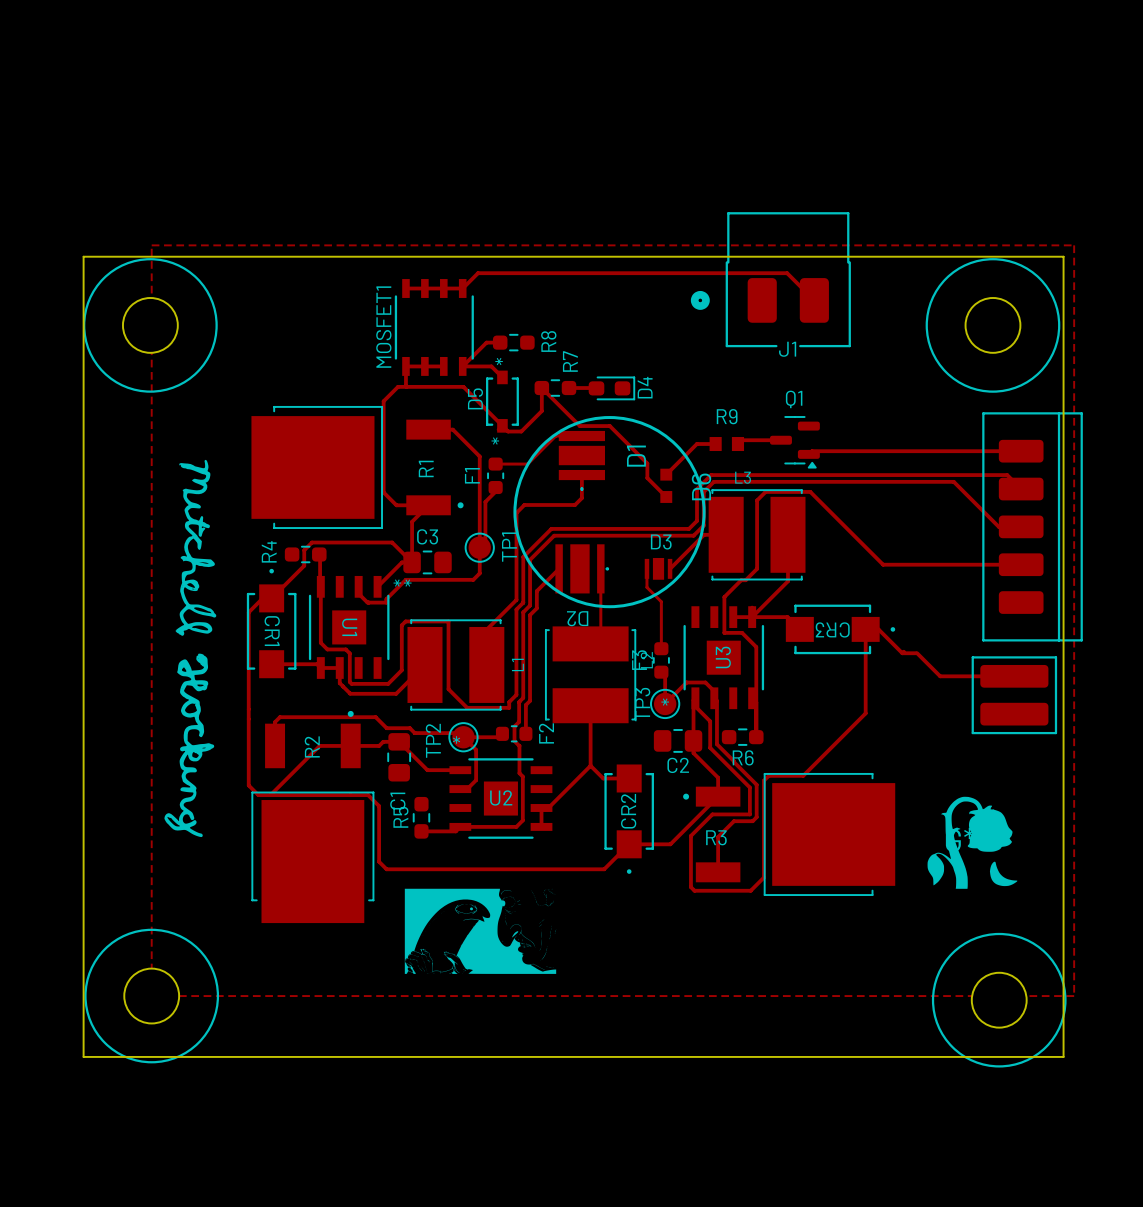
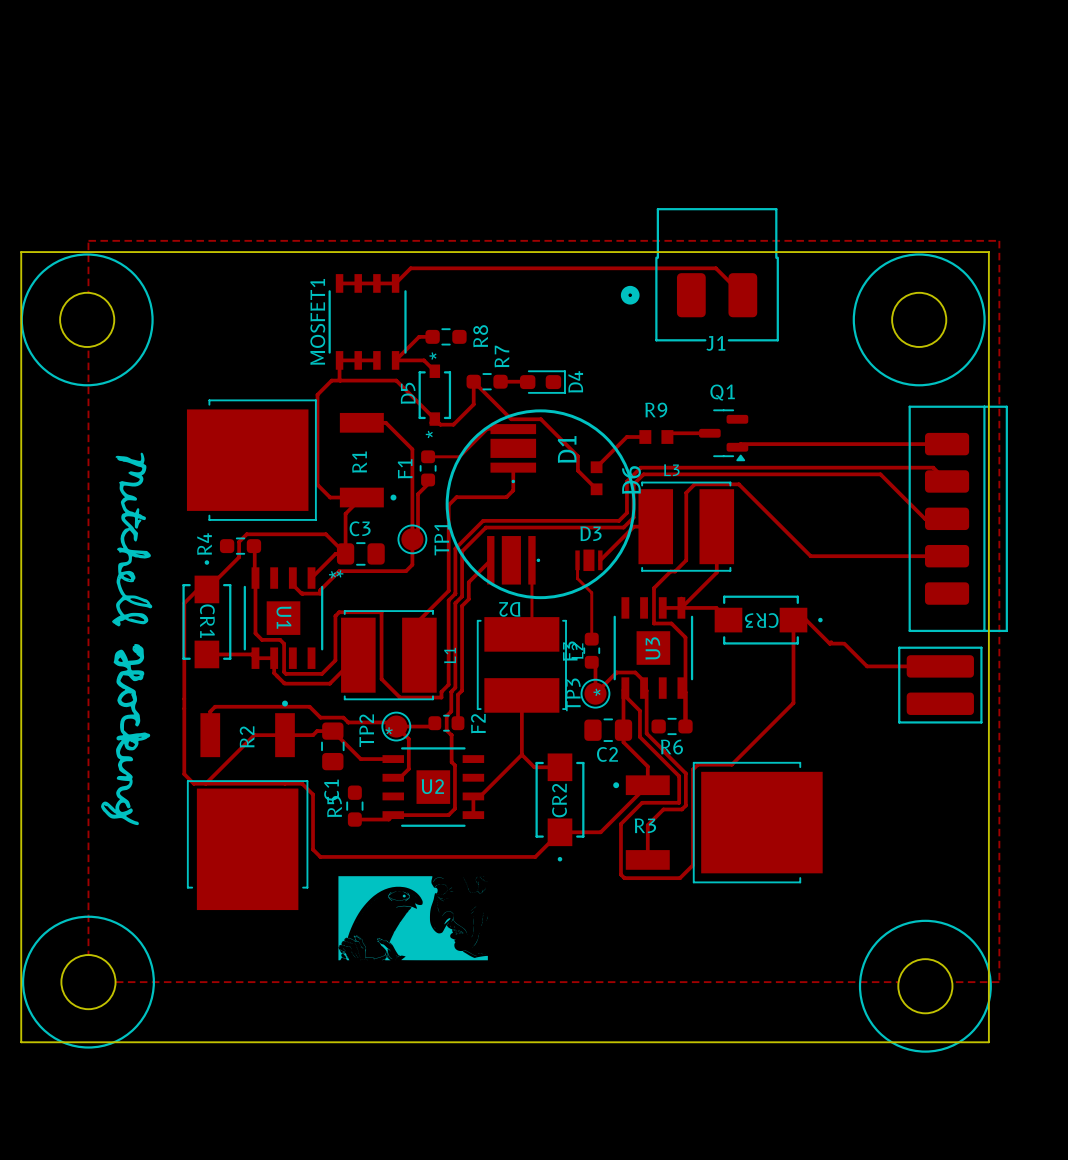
part: (972, 842) -> none

